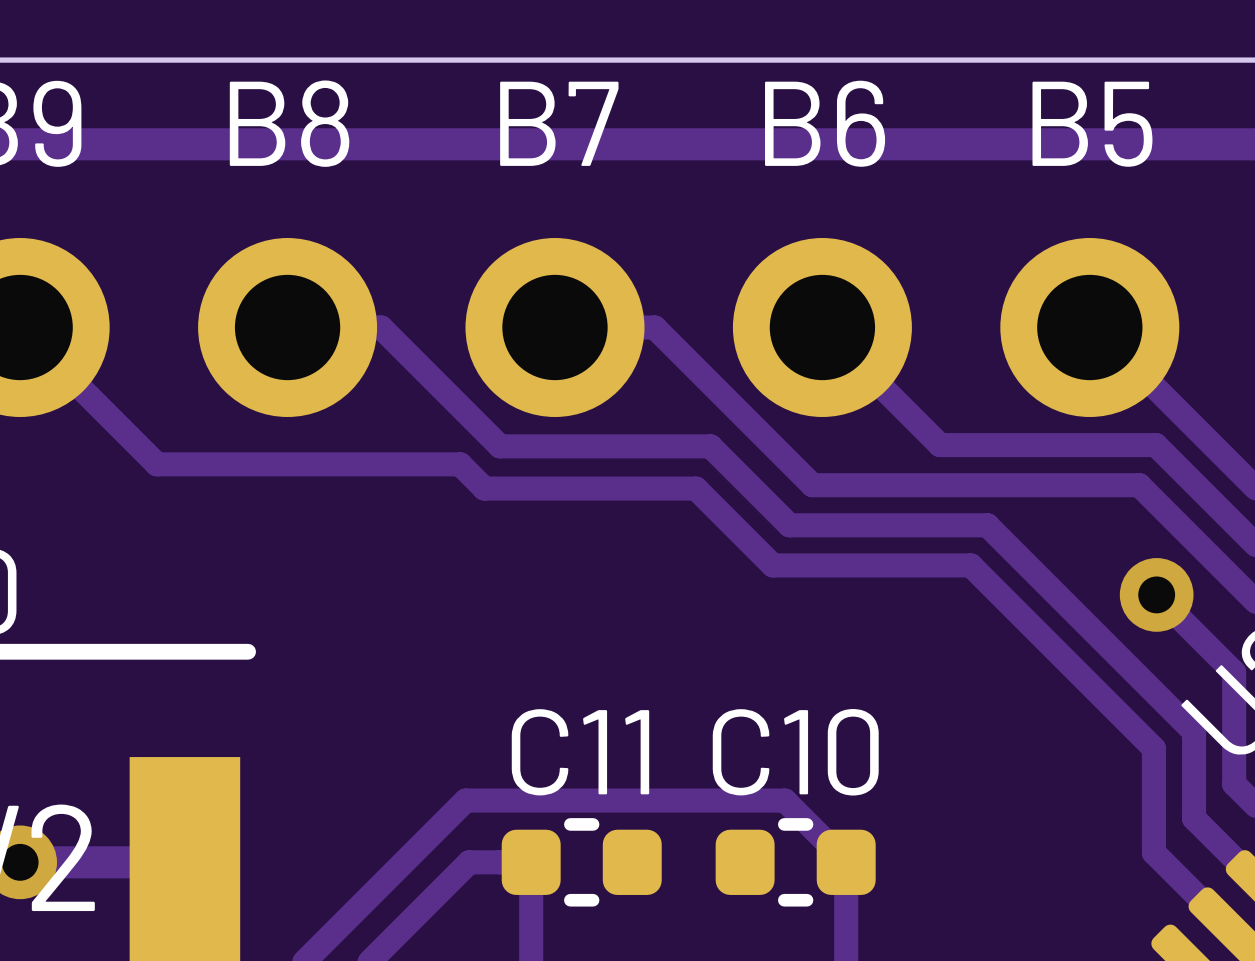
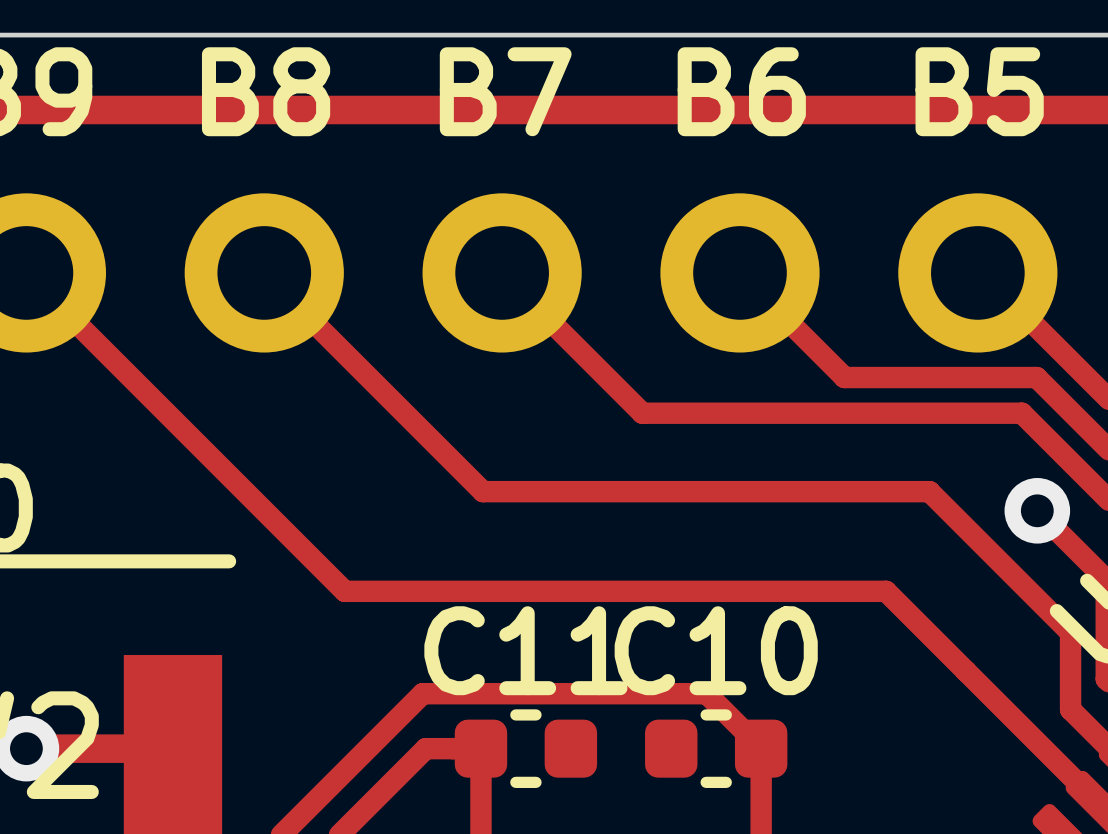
track: (287, 327) (381, 327) (500, 446) (710, 446) (789, 525) (987, 525) (1035, 573) -> (264, 272) (482, 491) (929, 491)
track: (554, 327) (654, 327) (812, 485) -> (502, 272) (642, 413) (731, 413)
track: (157, 464) (460, 464) (484, 488) (696, 488) (772, 565) (970, 565) (1153, 748) (1153, 852) -> (148, 394) (344, 591) (886, 591) (1034, 740)

